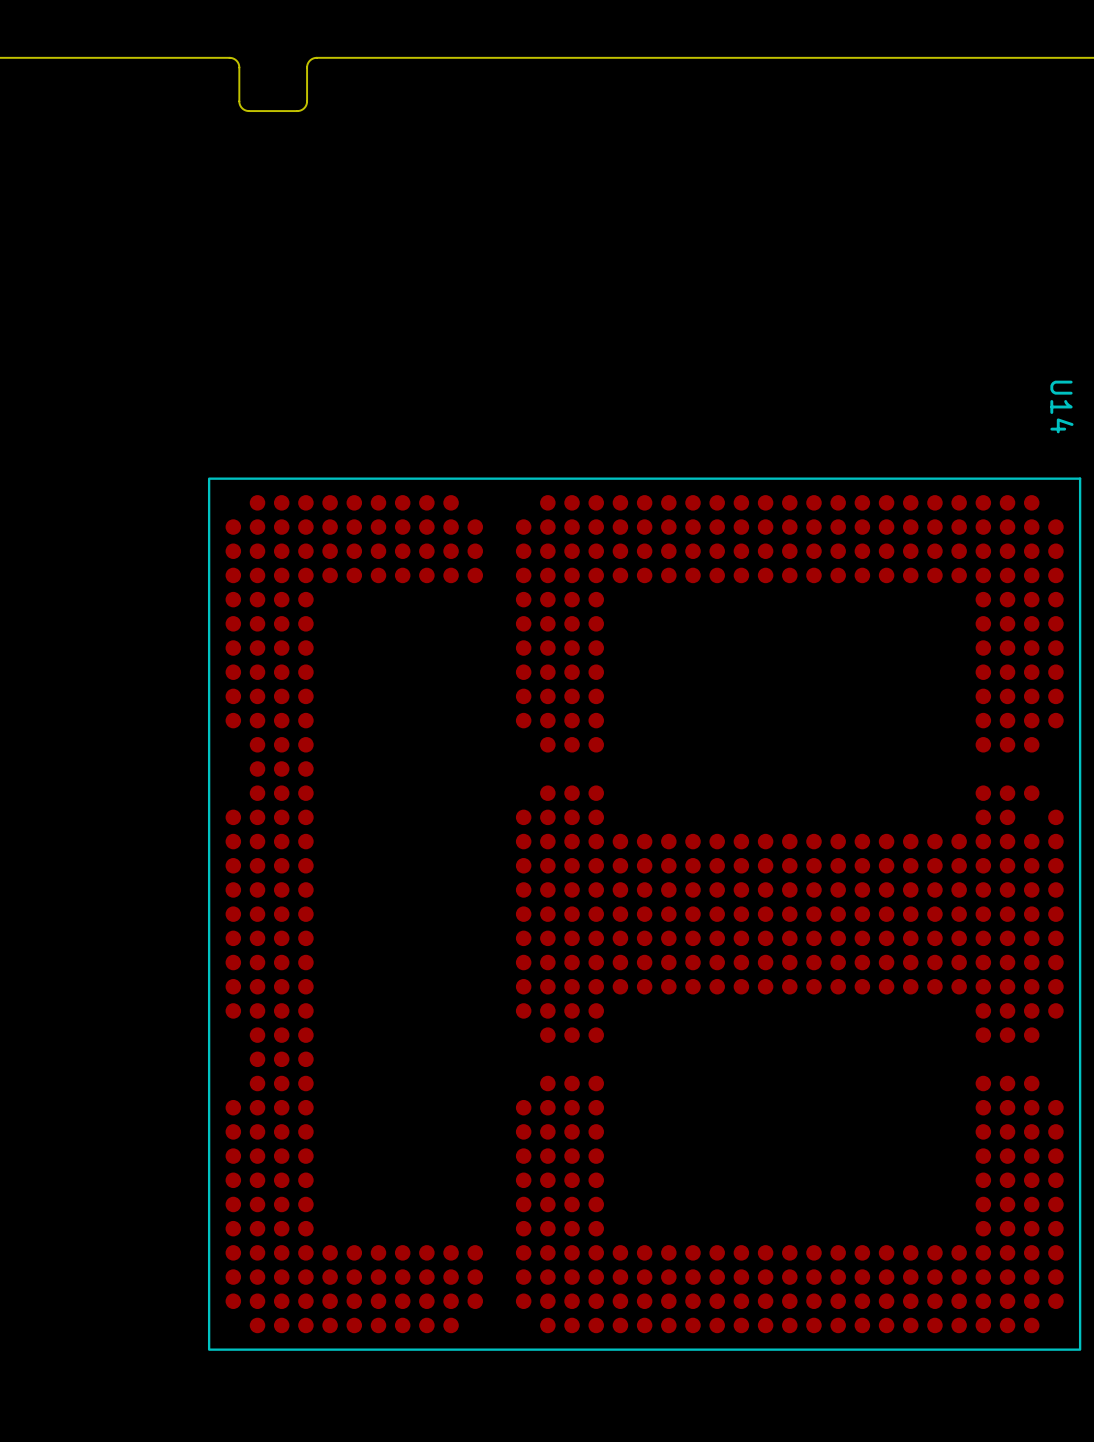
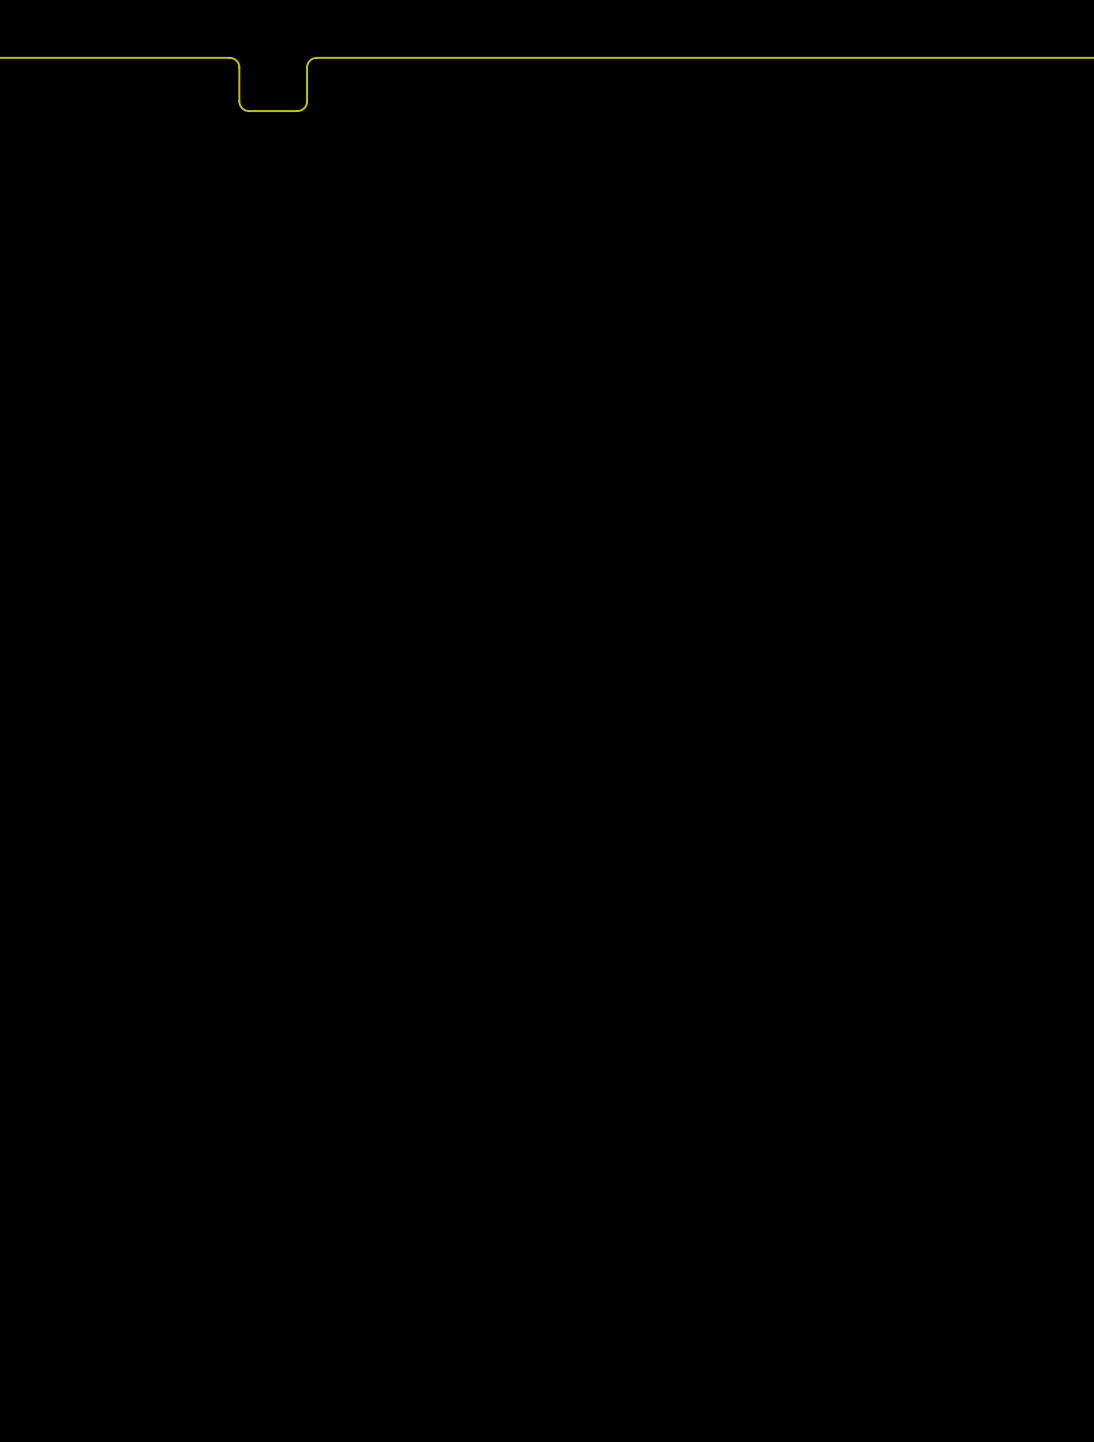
U14: (644, 914) -> none

